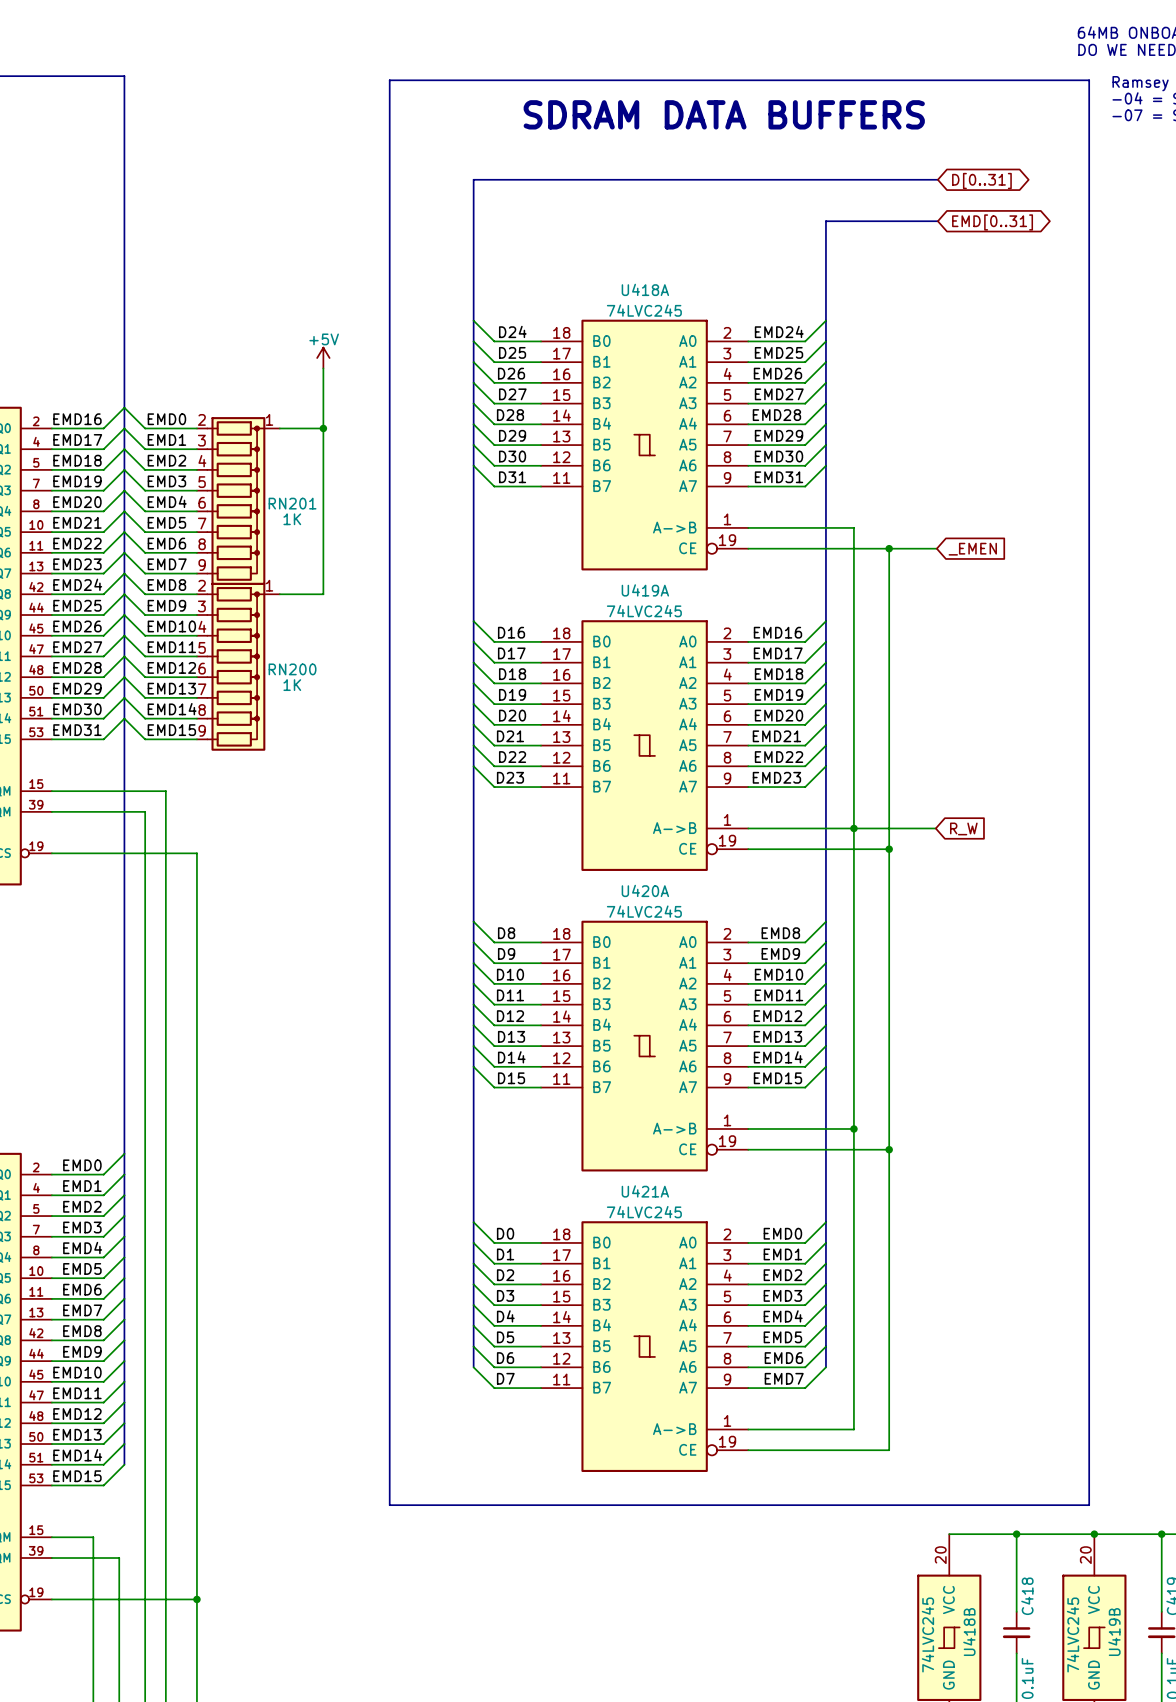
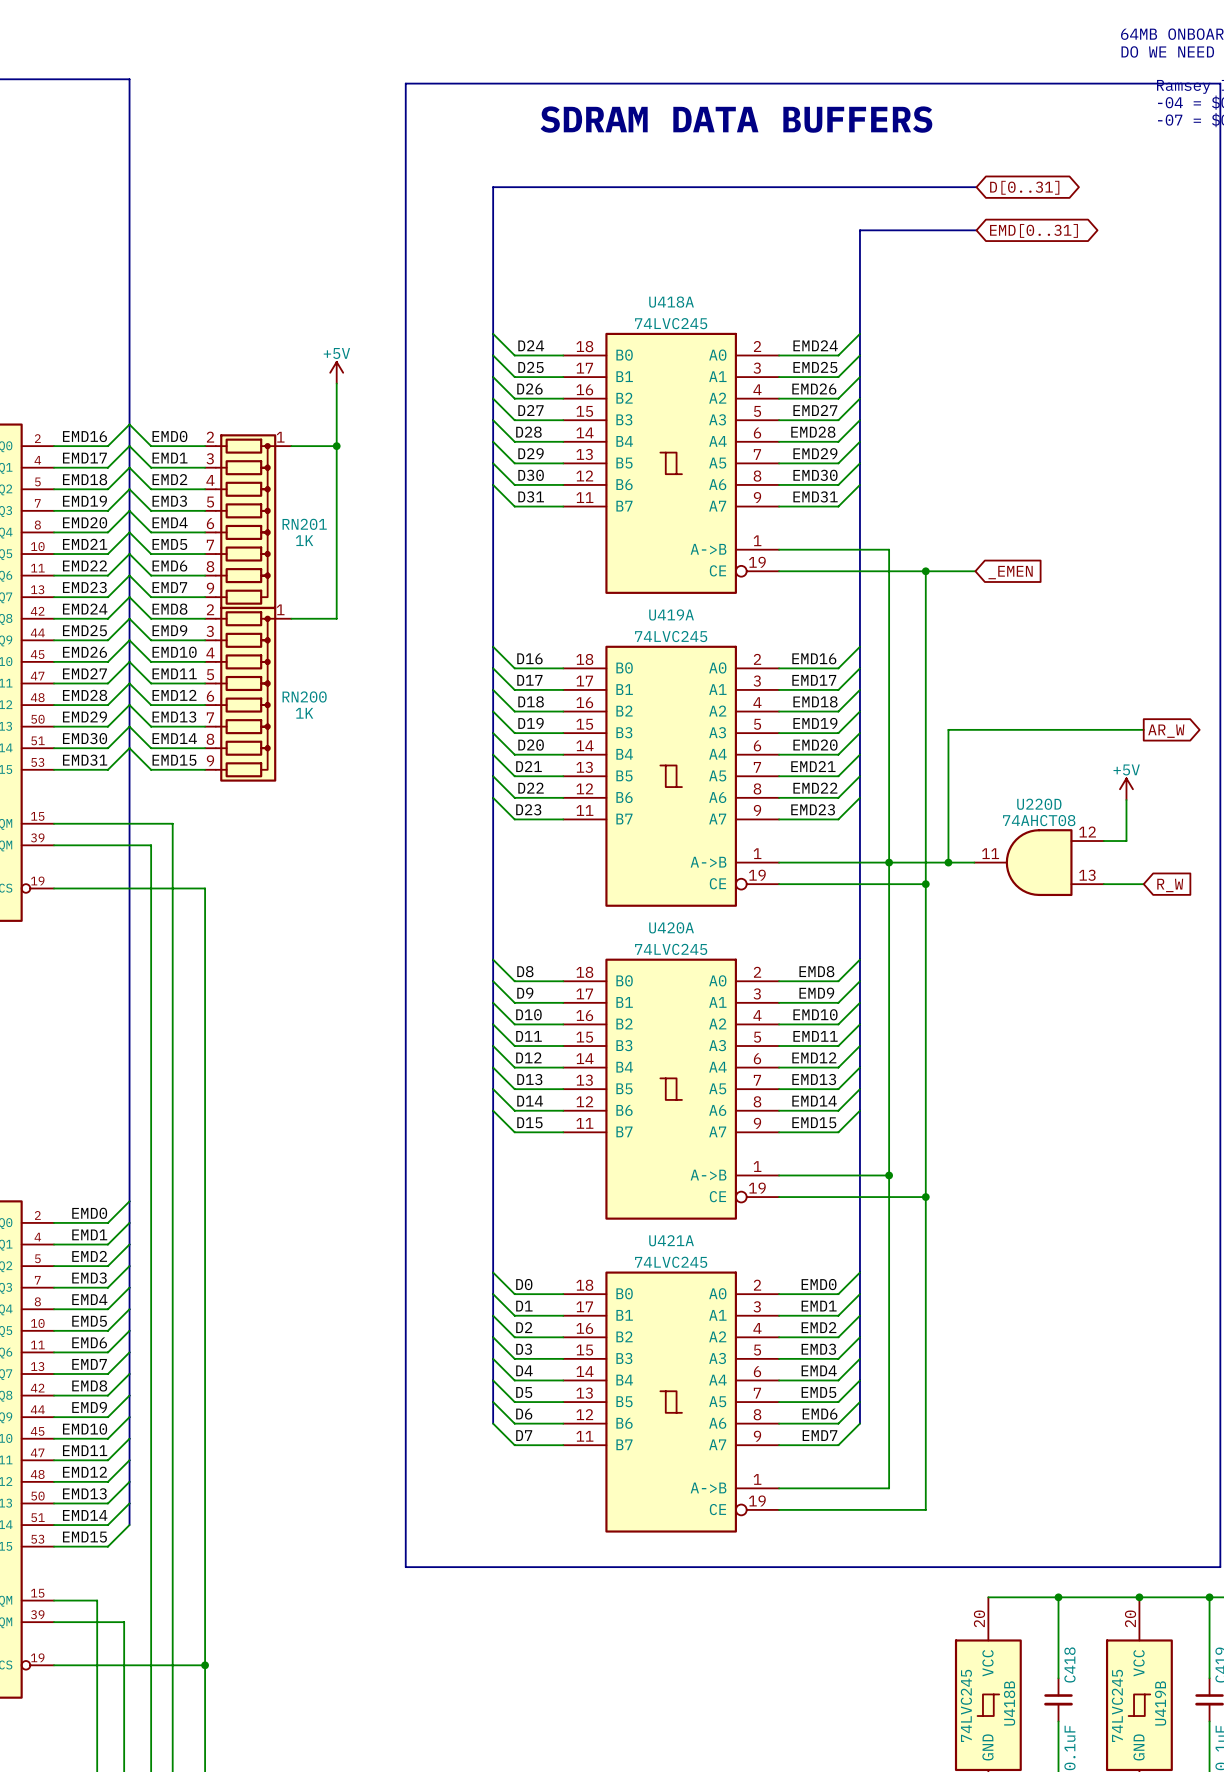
line: (1089, 80) (1089, 1505) -> (1134, 83) (1220, 83) (1220, 1567) (1134, 1567)
wire: none -> (1143, 729) (948, 729) (948, 862)
global label: none -> AR_W (1166, 731)
power symbol: none -> +5V (1126, 789)
wire: none -> (1126, 800) (1126, 841) (1103, 841)
junction: none -> (948, 862)
global label position: R_W (963, 828) -> R_W (1170, 885)
U220D: none -> 74AHCT08 (1039, 862)
wire: none -> (1103, 884) (1143, 884)

